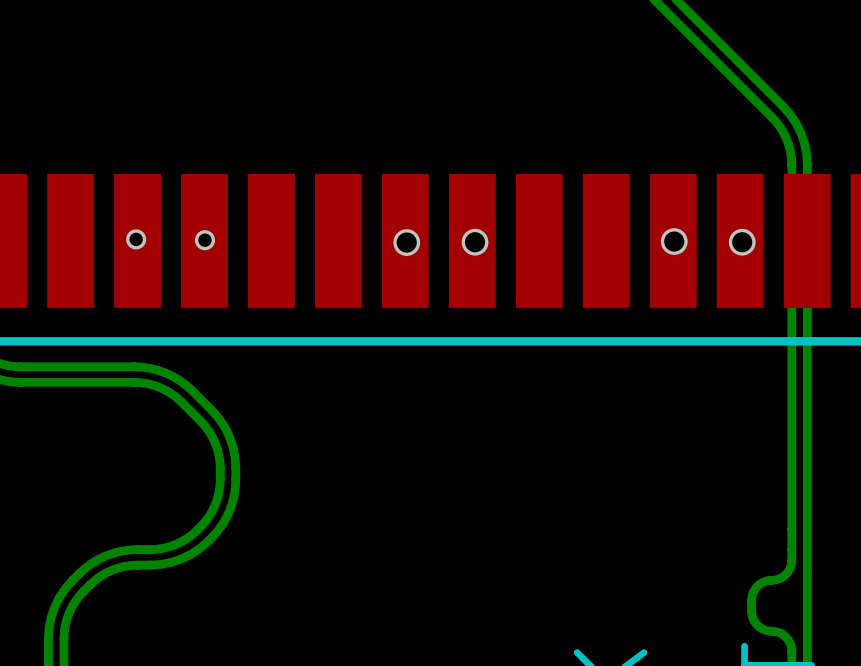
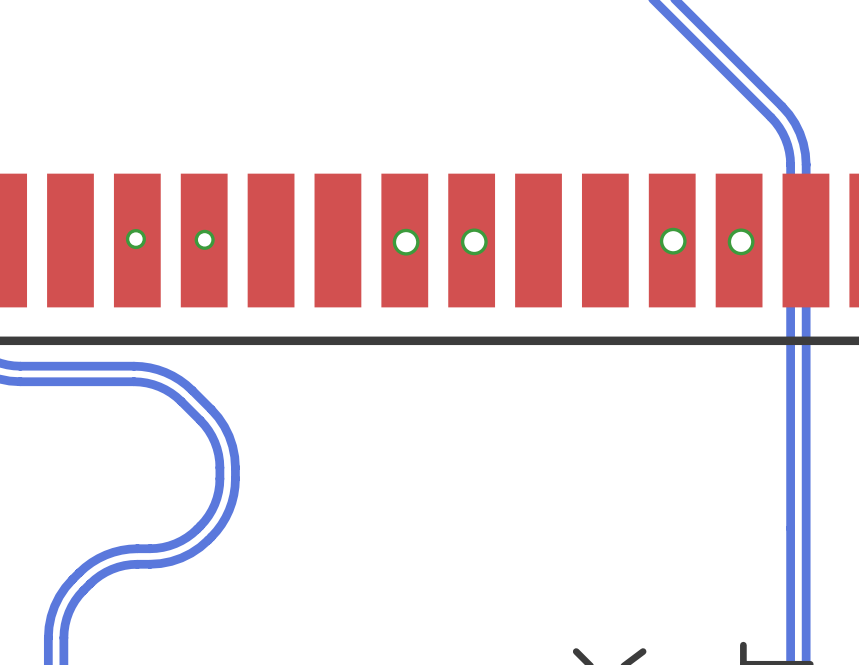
bottom track: (791, 560) (790, 567) (785, 574) (779, 578) (759, 584) (754, 590) (751, 600) (751, 613) (755, 623) (764, 629) (783, 635) (789, 641) (791, 651) -> (790, 559) (790, 650)

